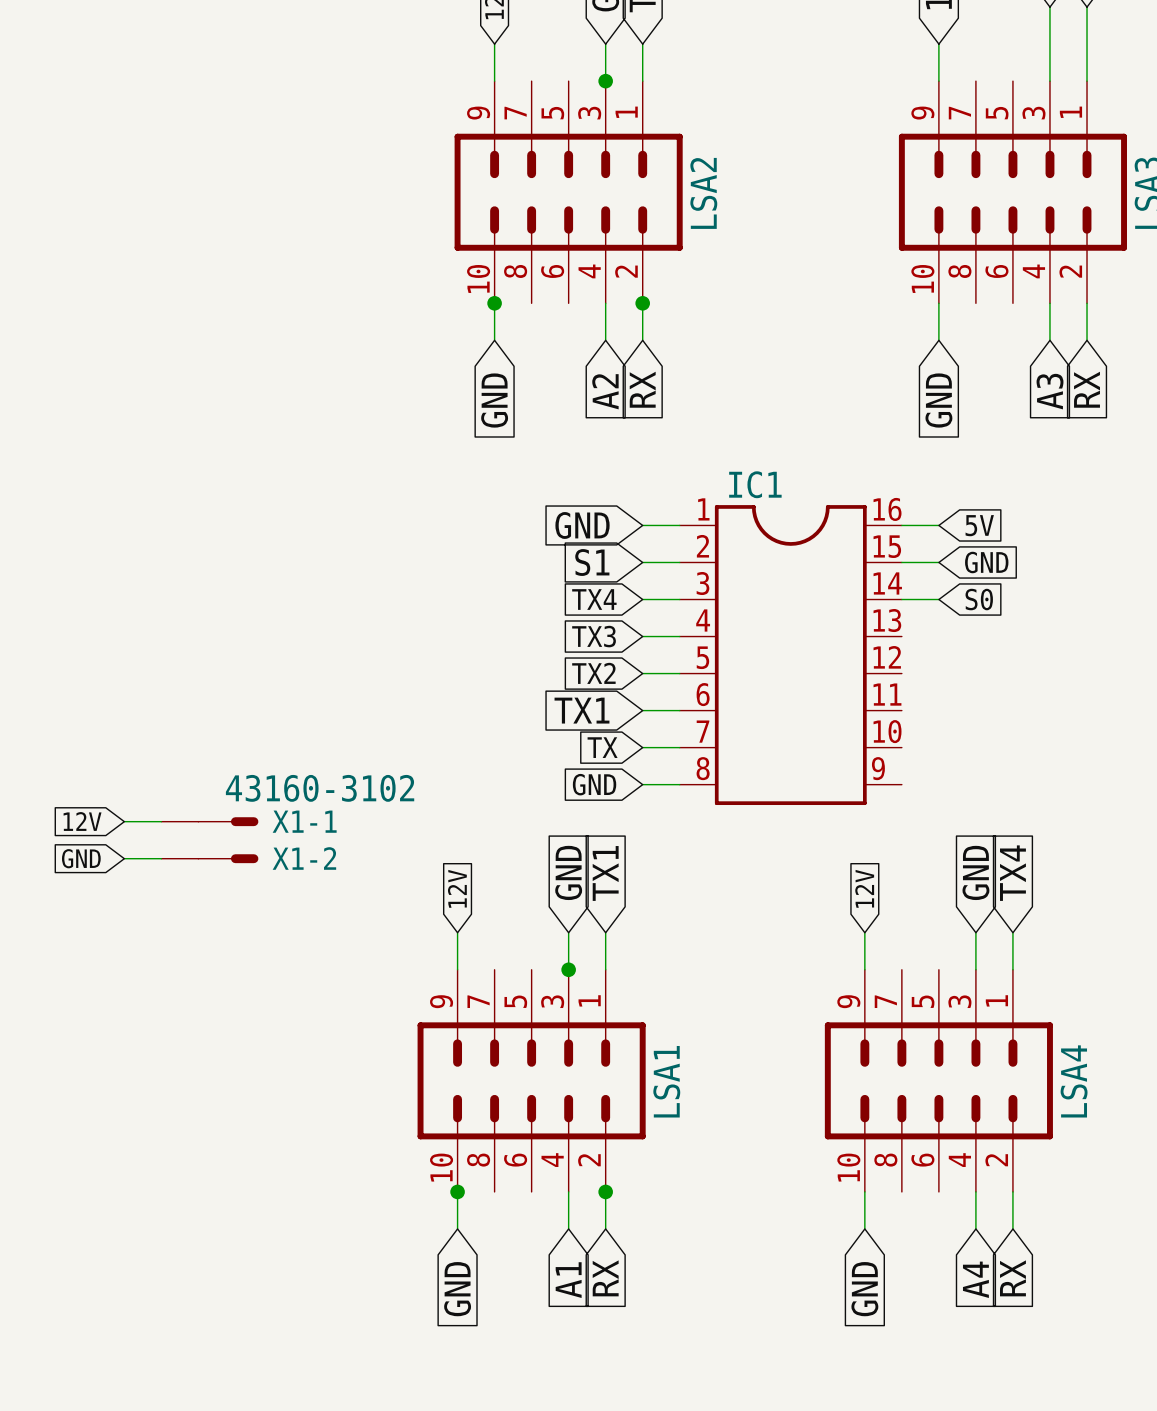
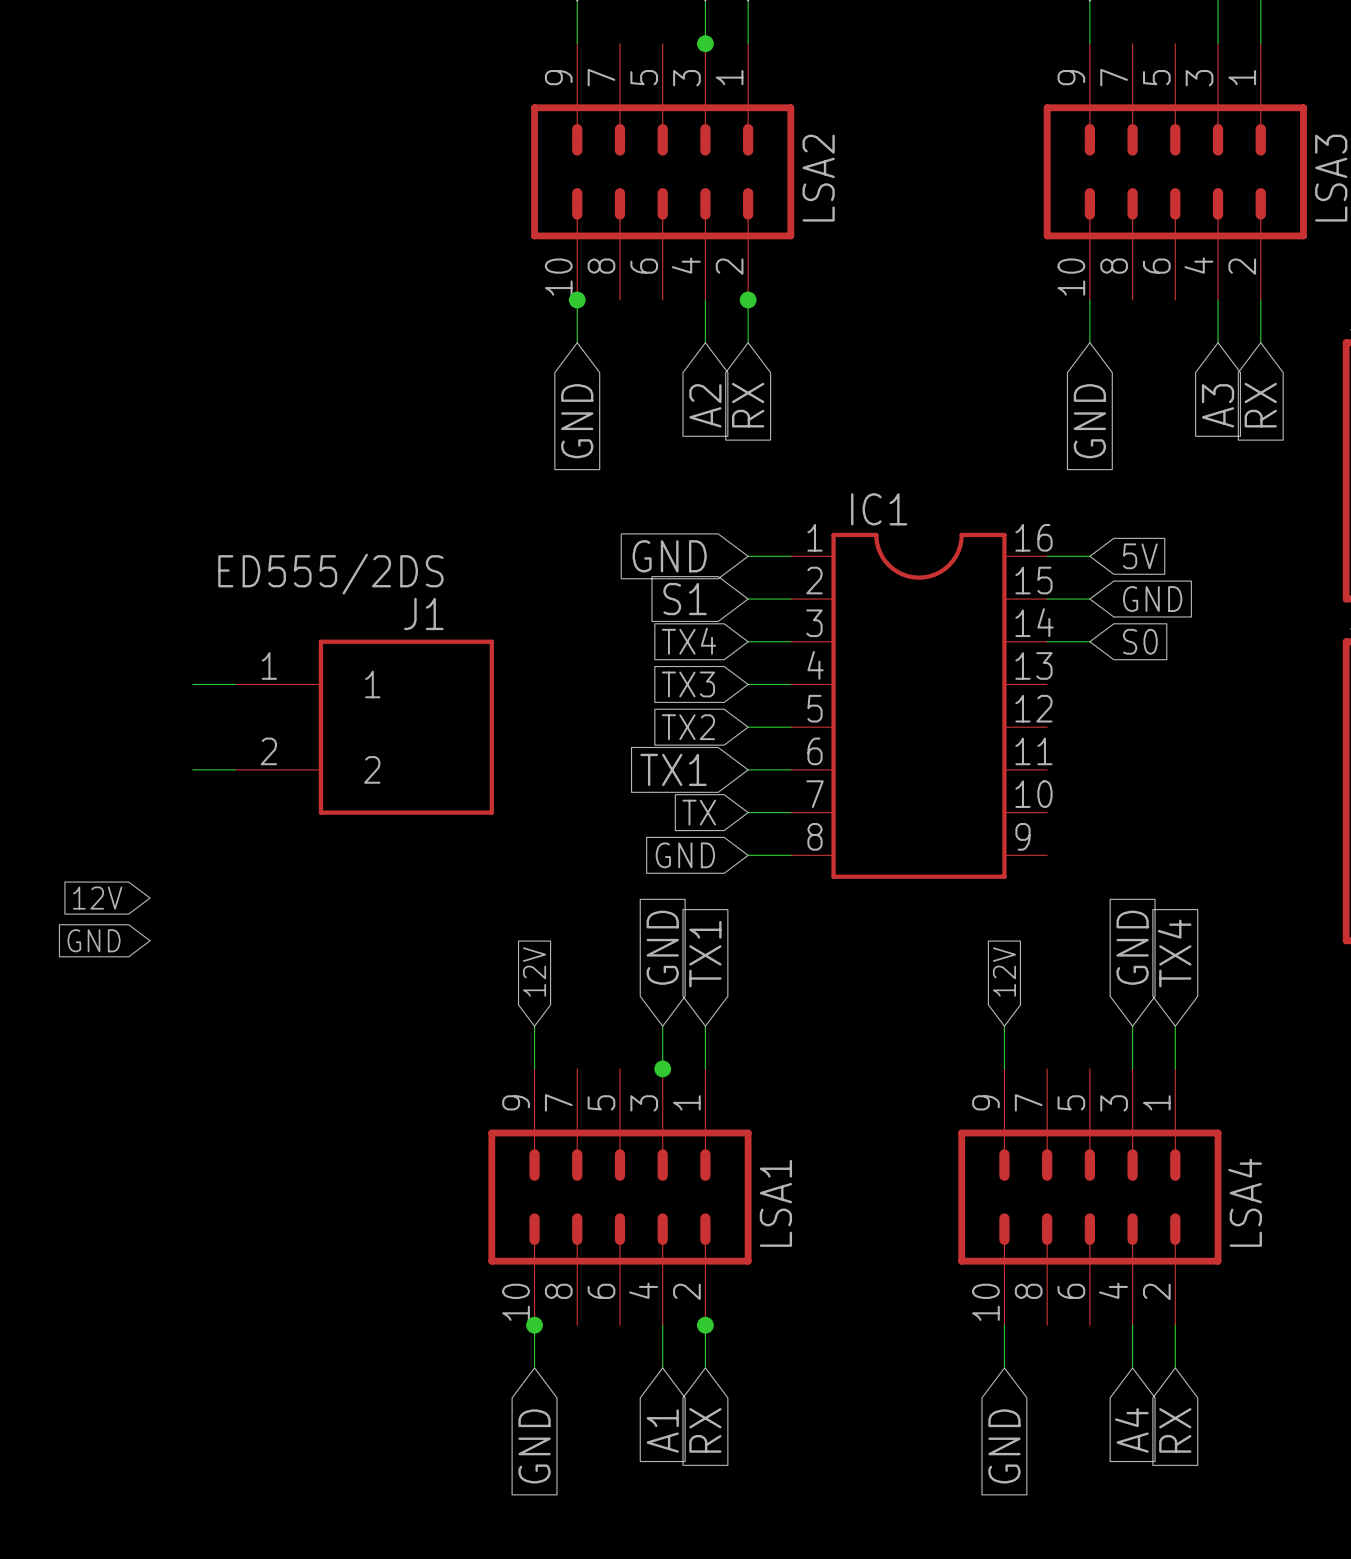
J1: none -> ED555/2DS (364, 727)
wire: (124, 821) (161, 821) -> (192, 769) (235, 769)
X1-1: 43160-3102 (209, 821) -> none
wire: (124, 858) (161, 858) -> (192, 684) (235, 684)
X1-2: (209, 858) -> none

